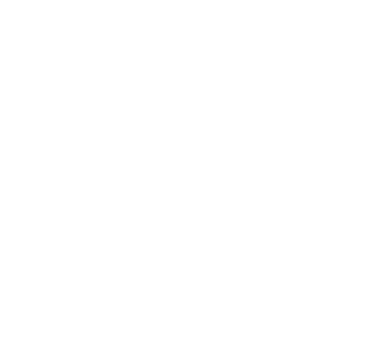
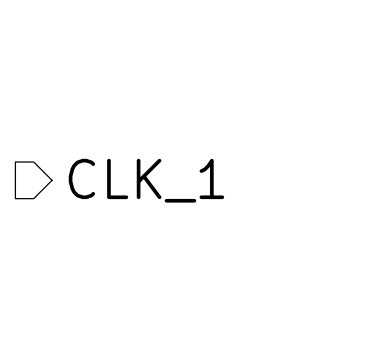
hierarchical label: none -> CLK_1 (146, 180)

